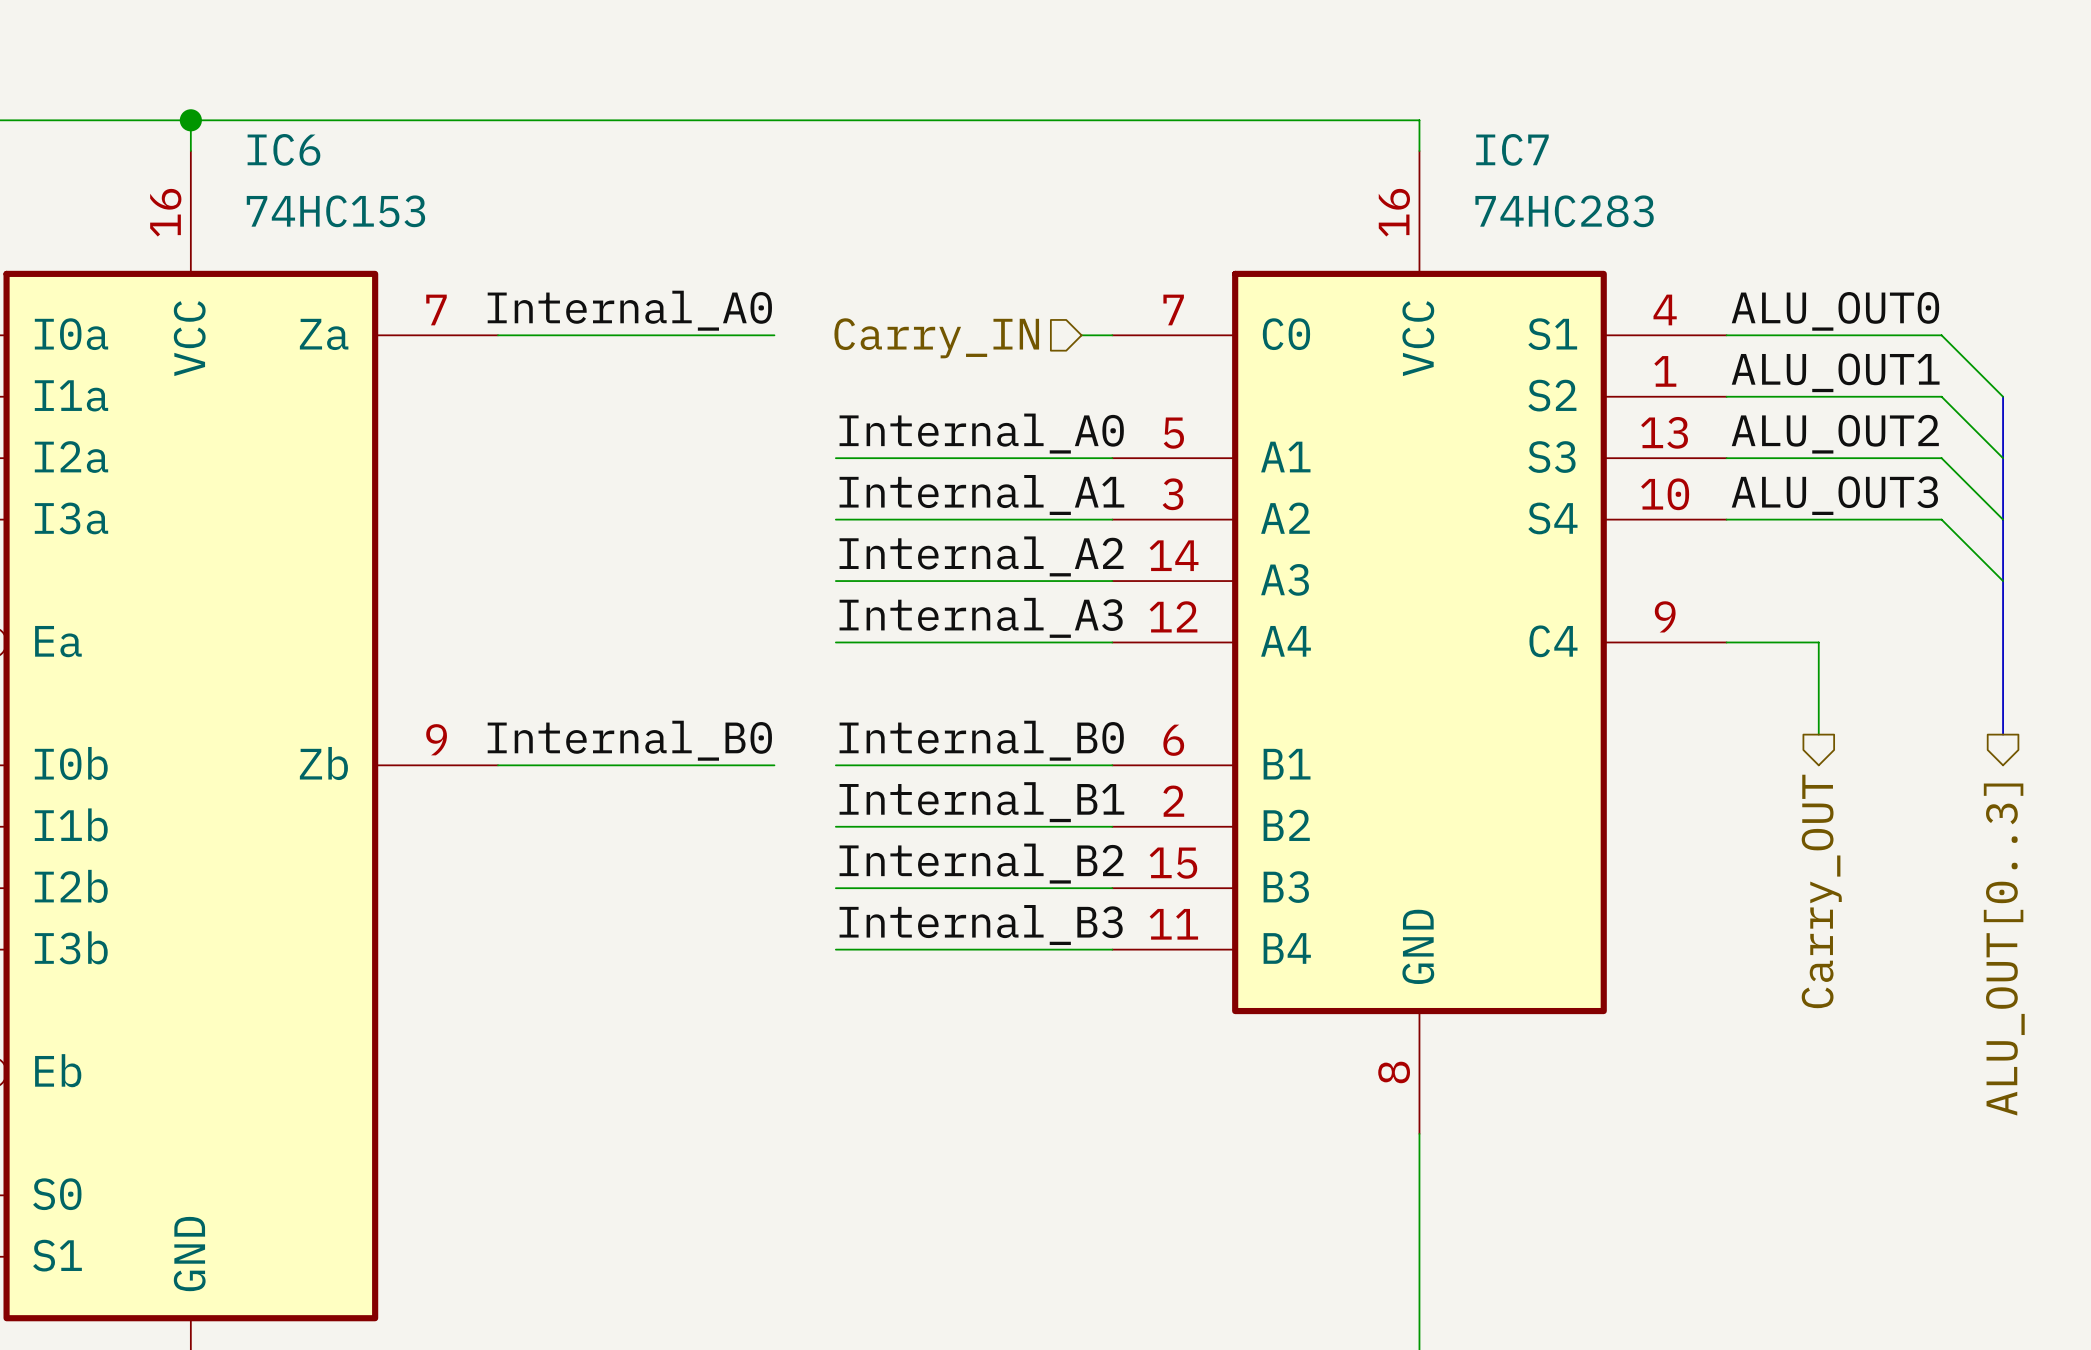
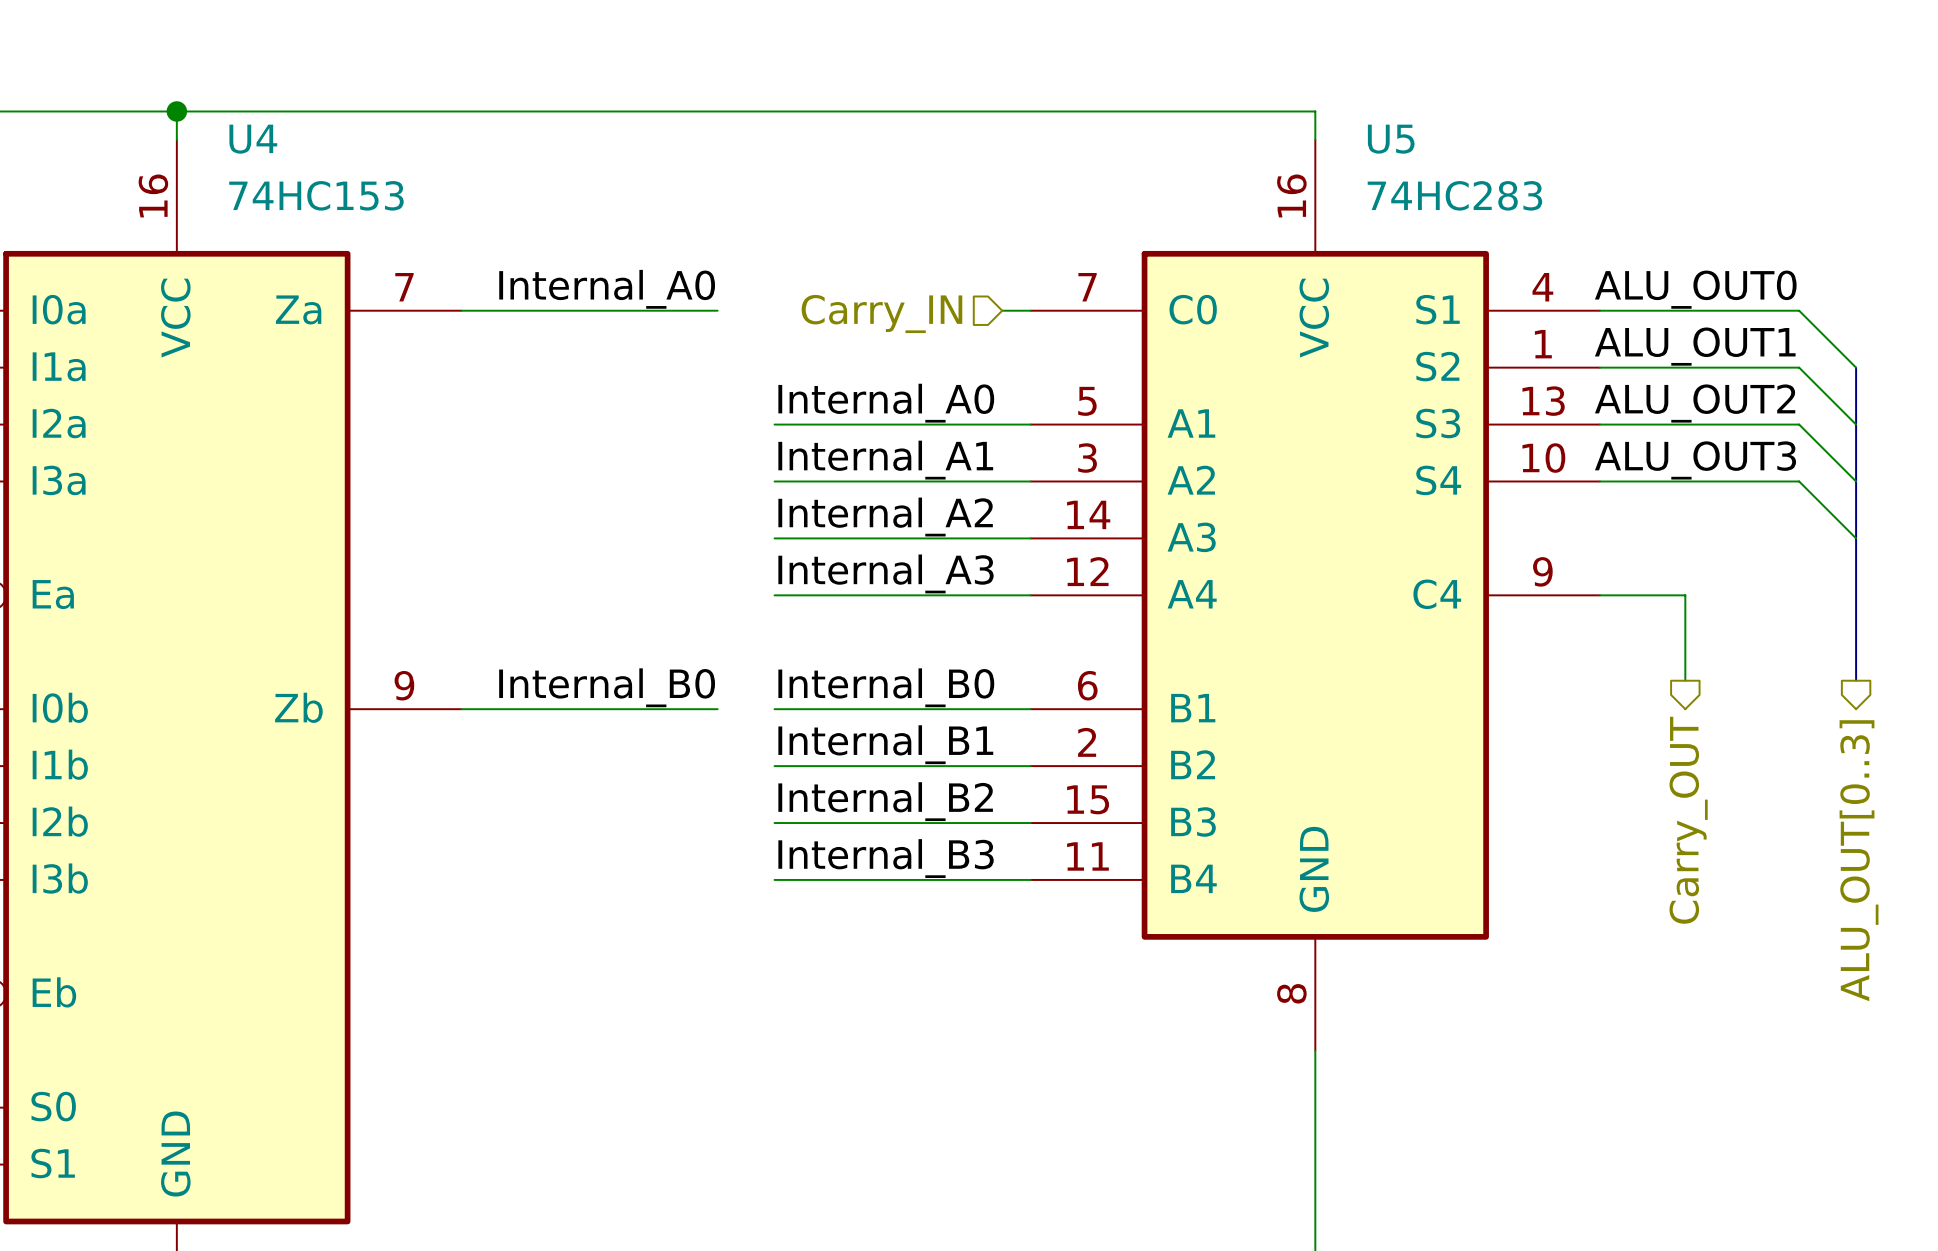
IC6 name: IC6 (283, 149) -> U4 (253, 139)
IC7 name: IC7 (1512, 149) -> U5 (1391, 139)

